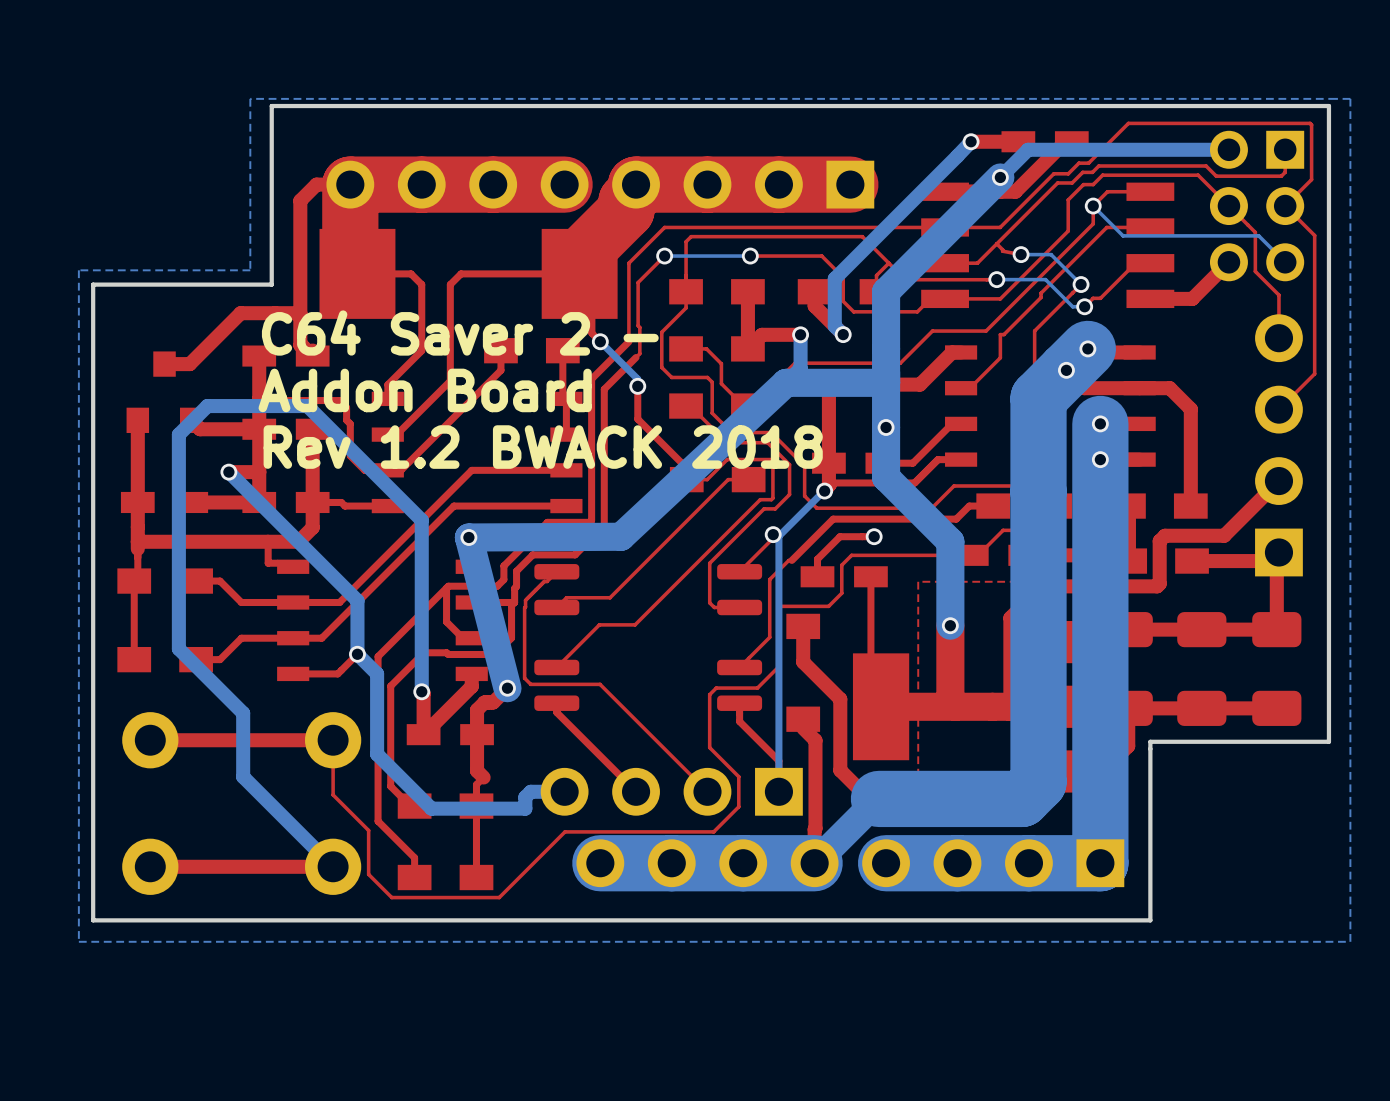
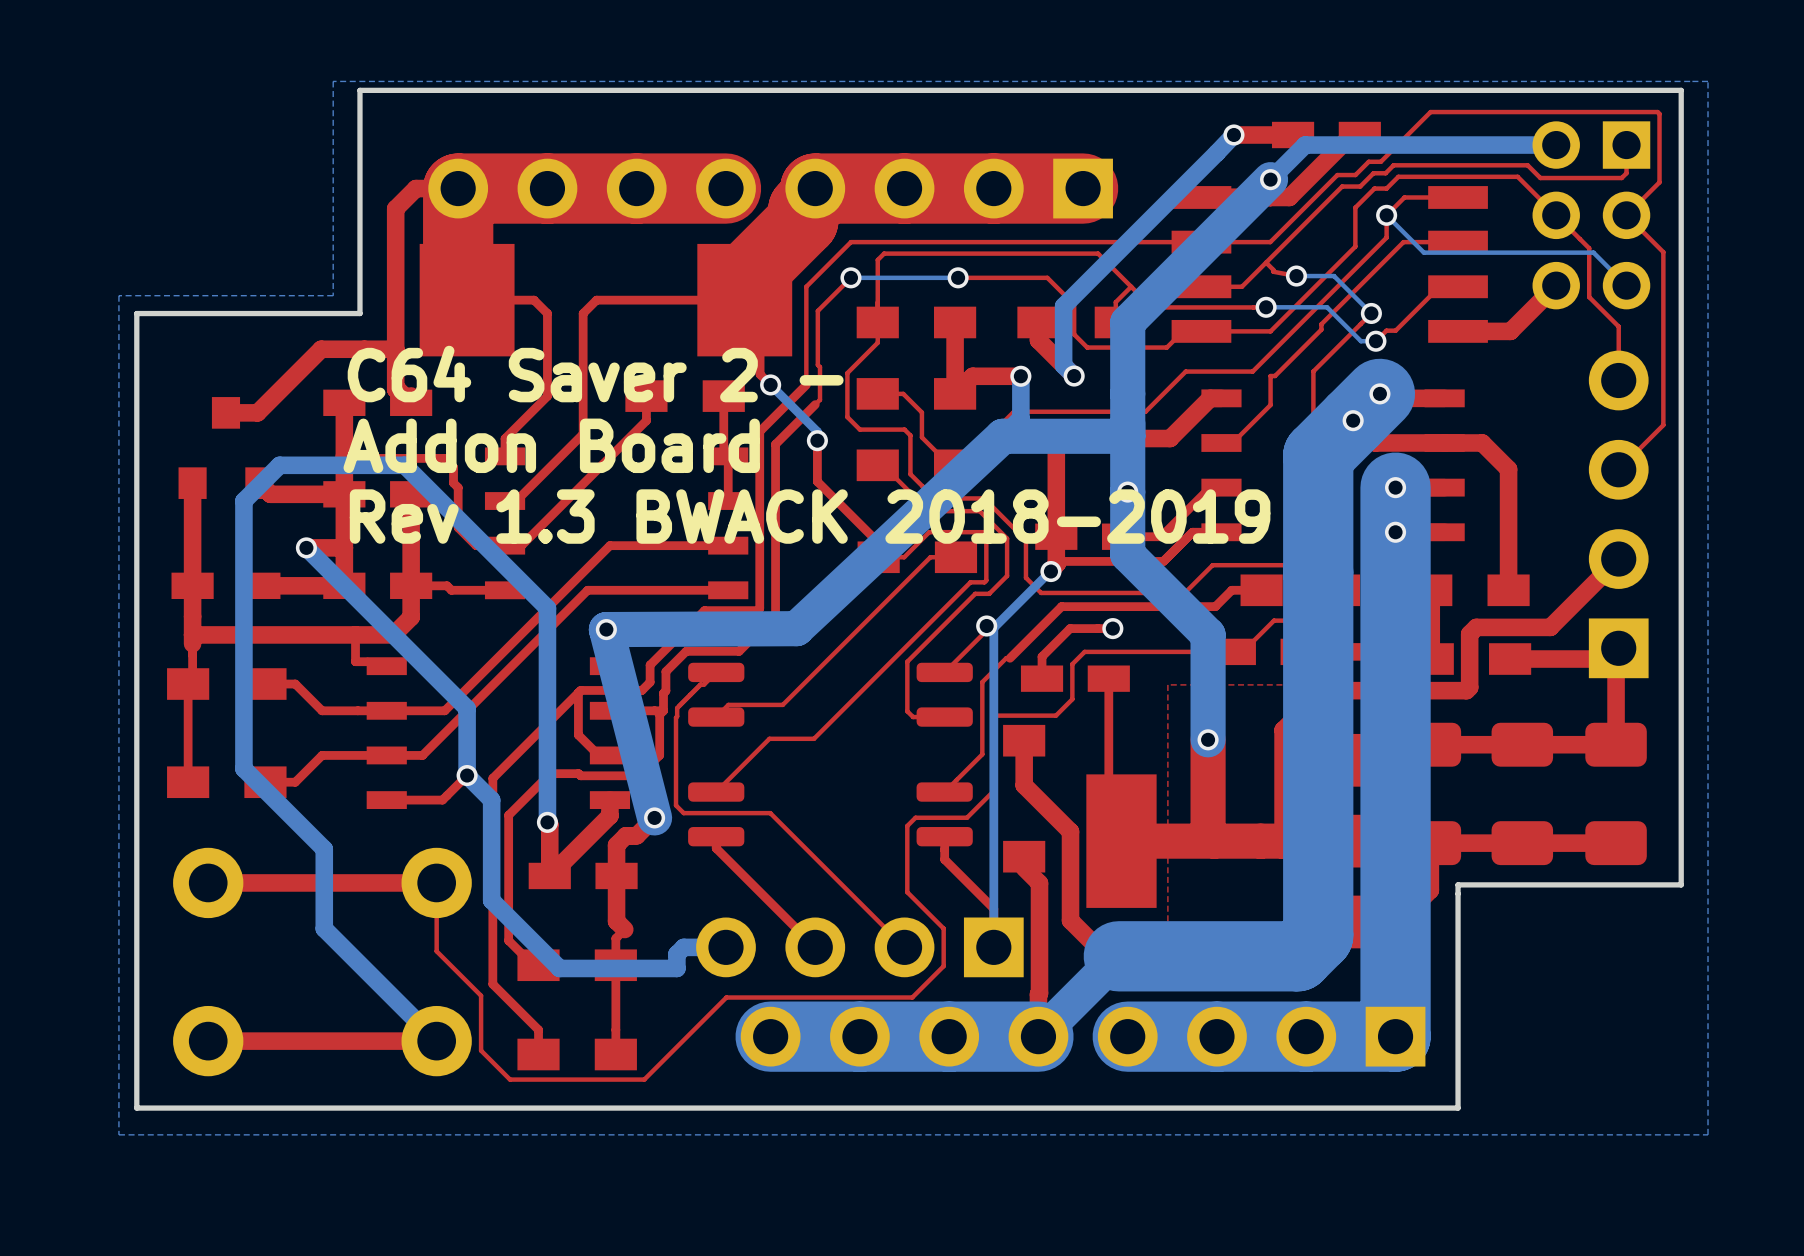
text: Rev 1.2 BWACK 2018 (543, 447) -> Rev 1.3 BWACK 2018-2019 (810, 516)

